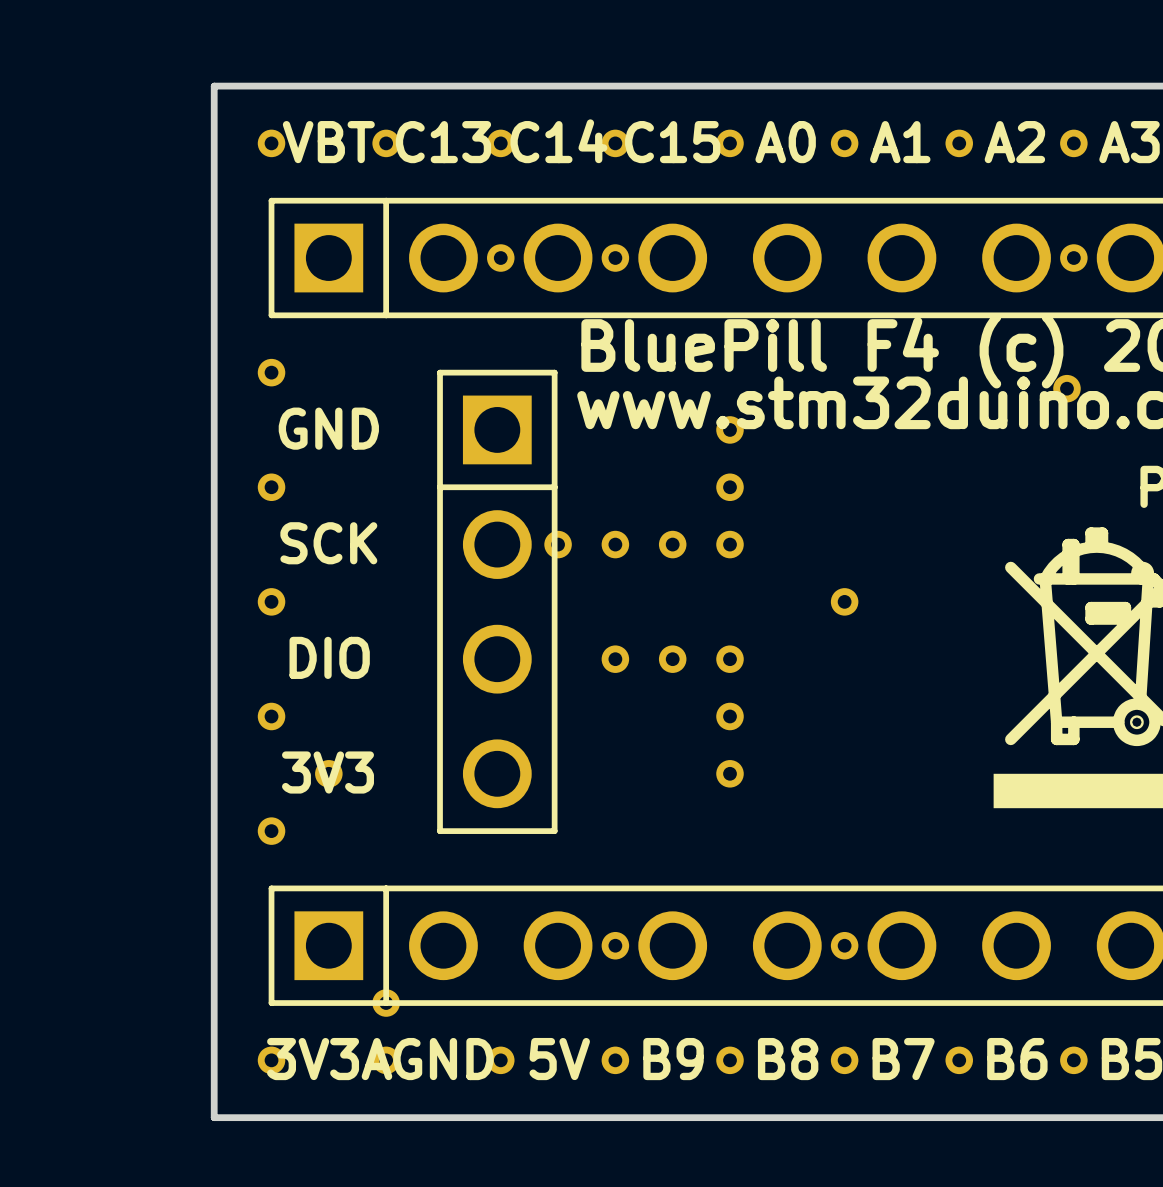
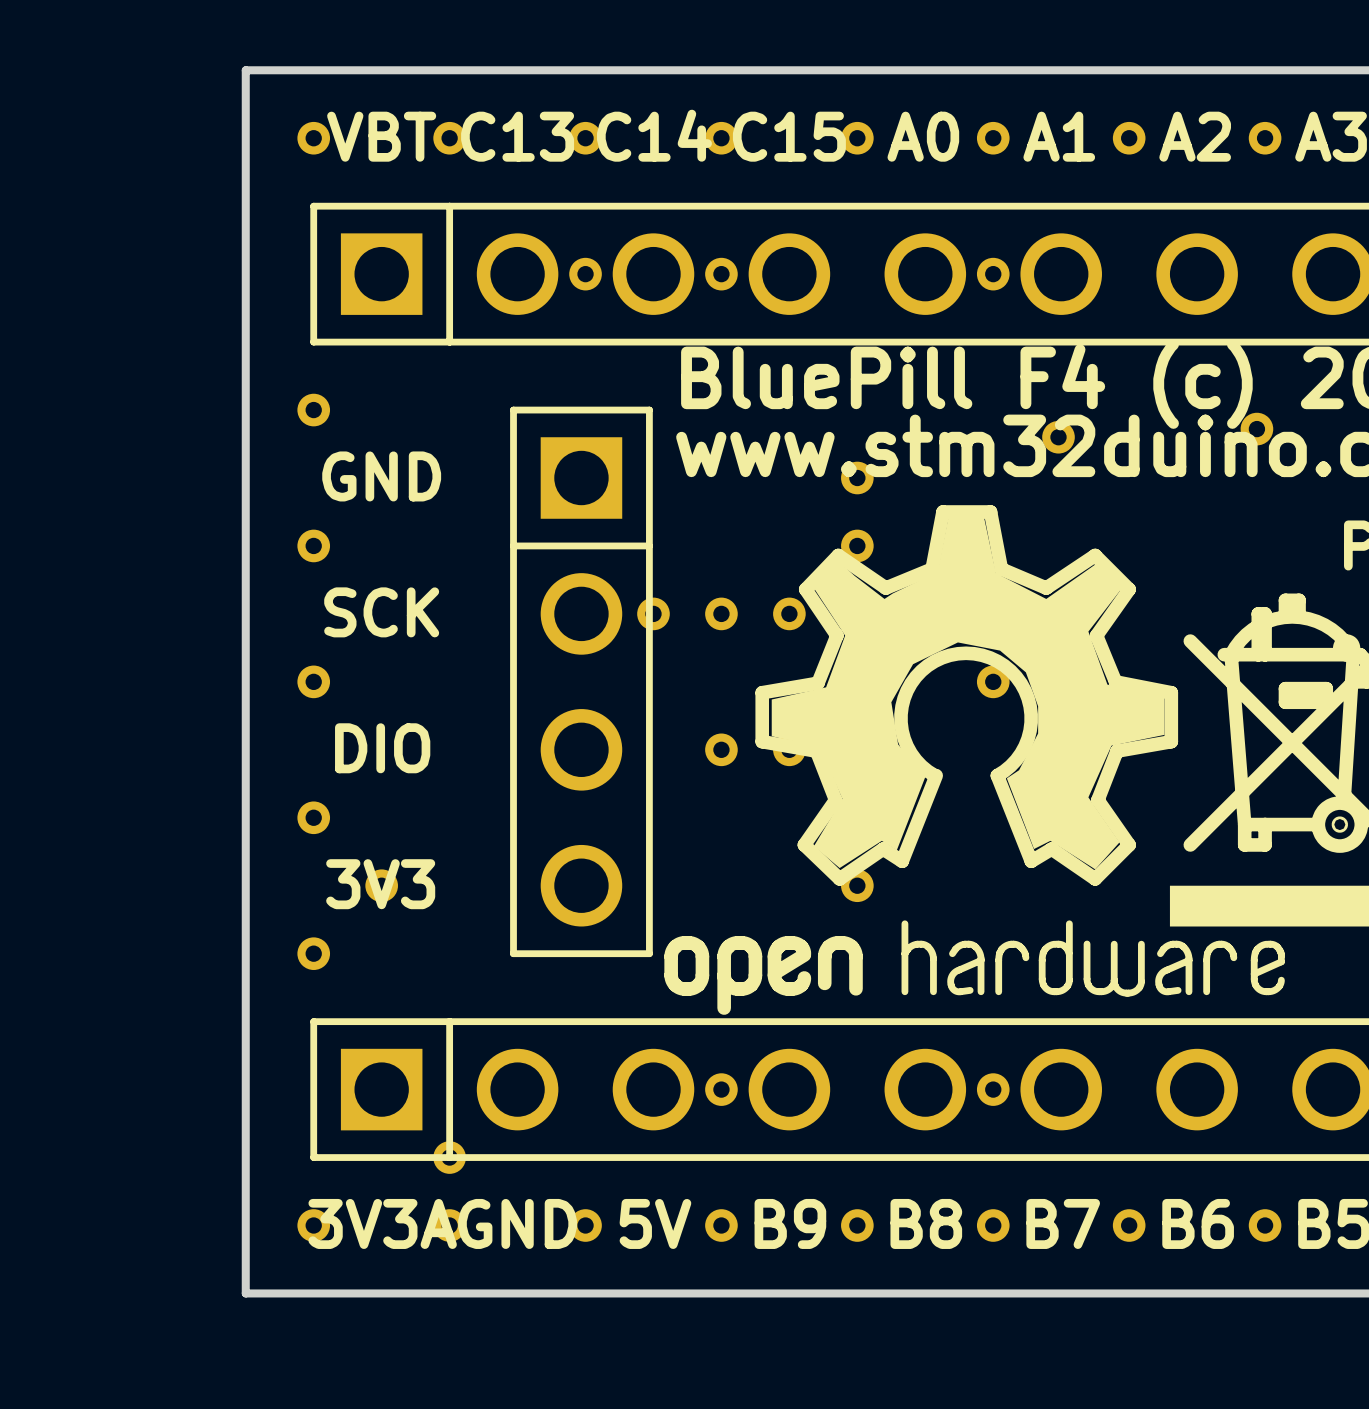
part: none -> (993, 274)
part: (1073, 258) -> none
part: none -> (1058, 437)
drawing: none -> [664, 505, 1285, 1015]

